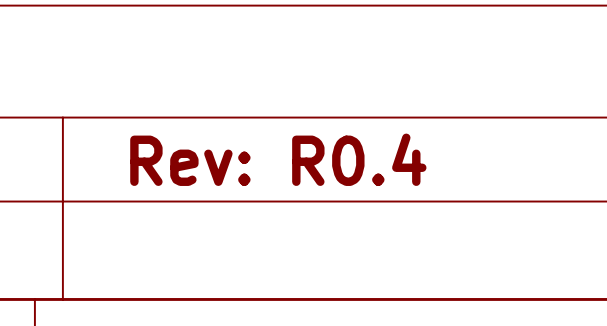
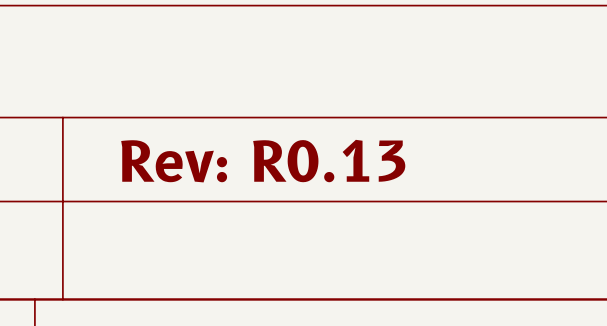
title block: Rev: R0.4 (278, 159) -> Rev: R0.13 (263, 161)

